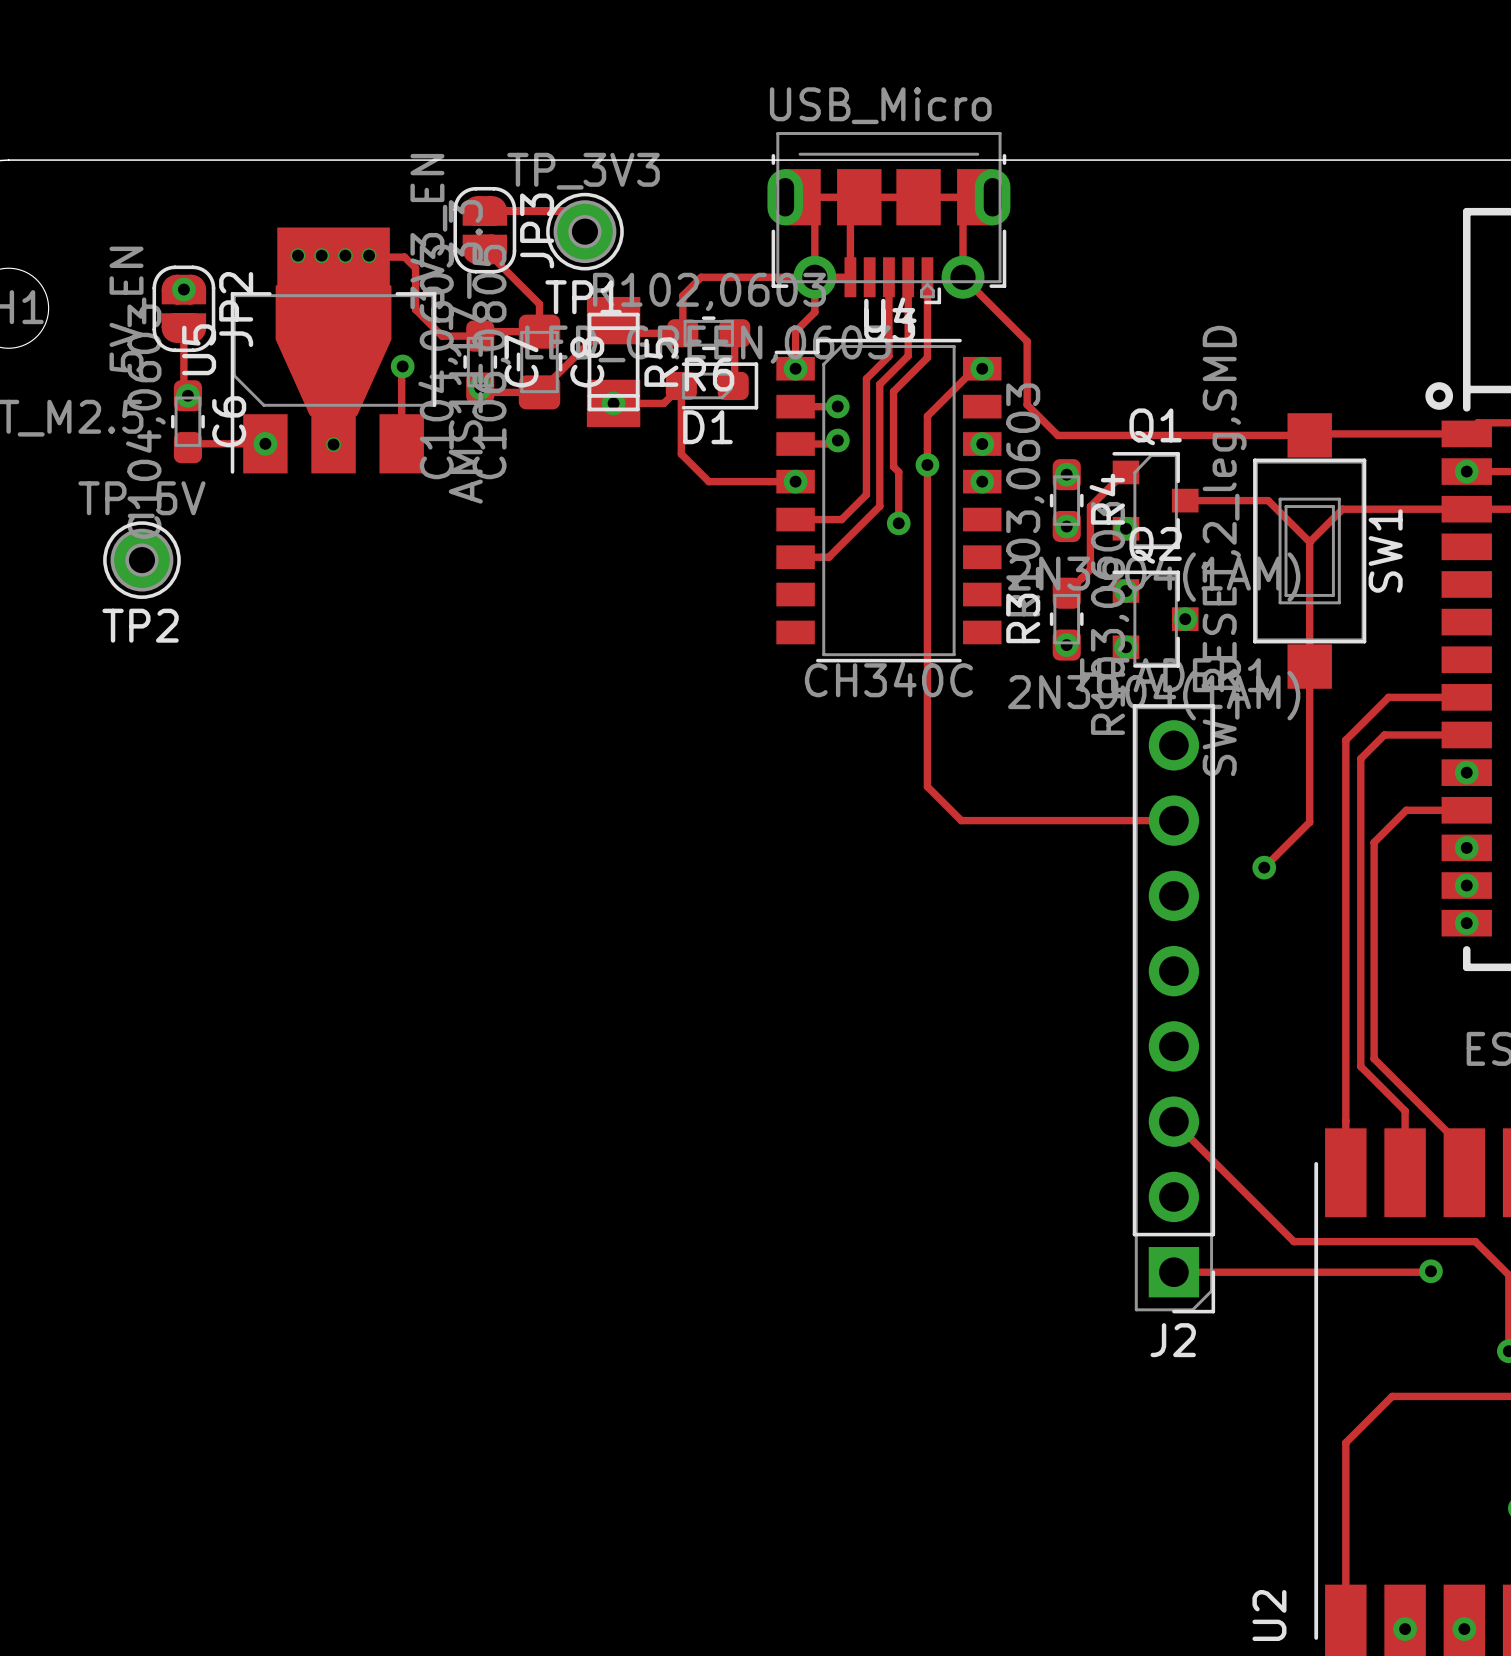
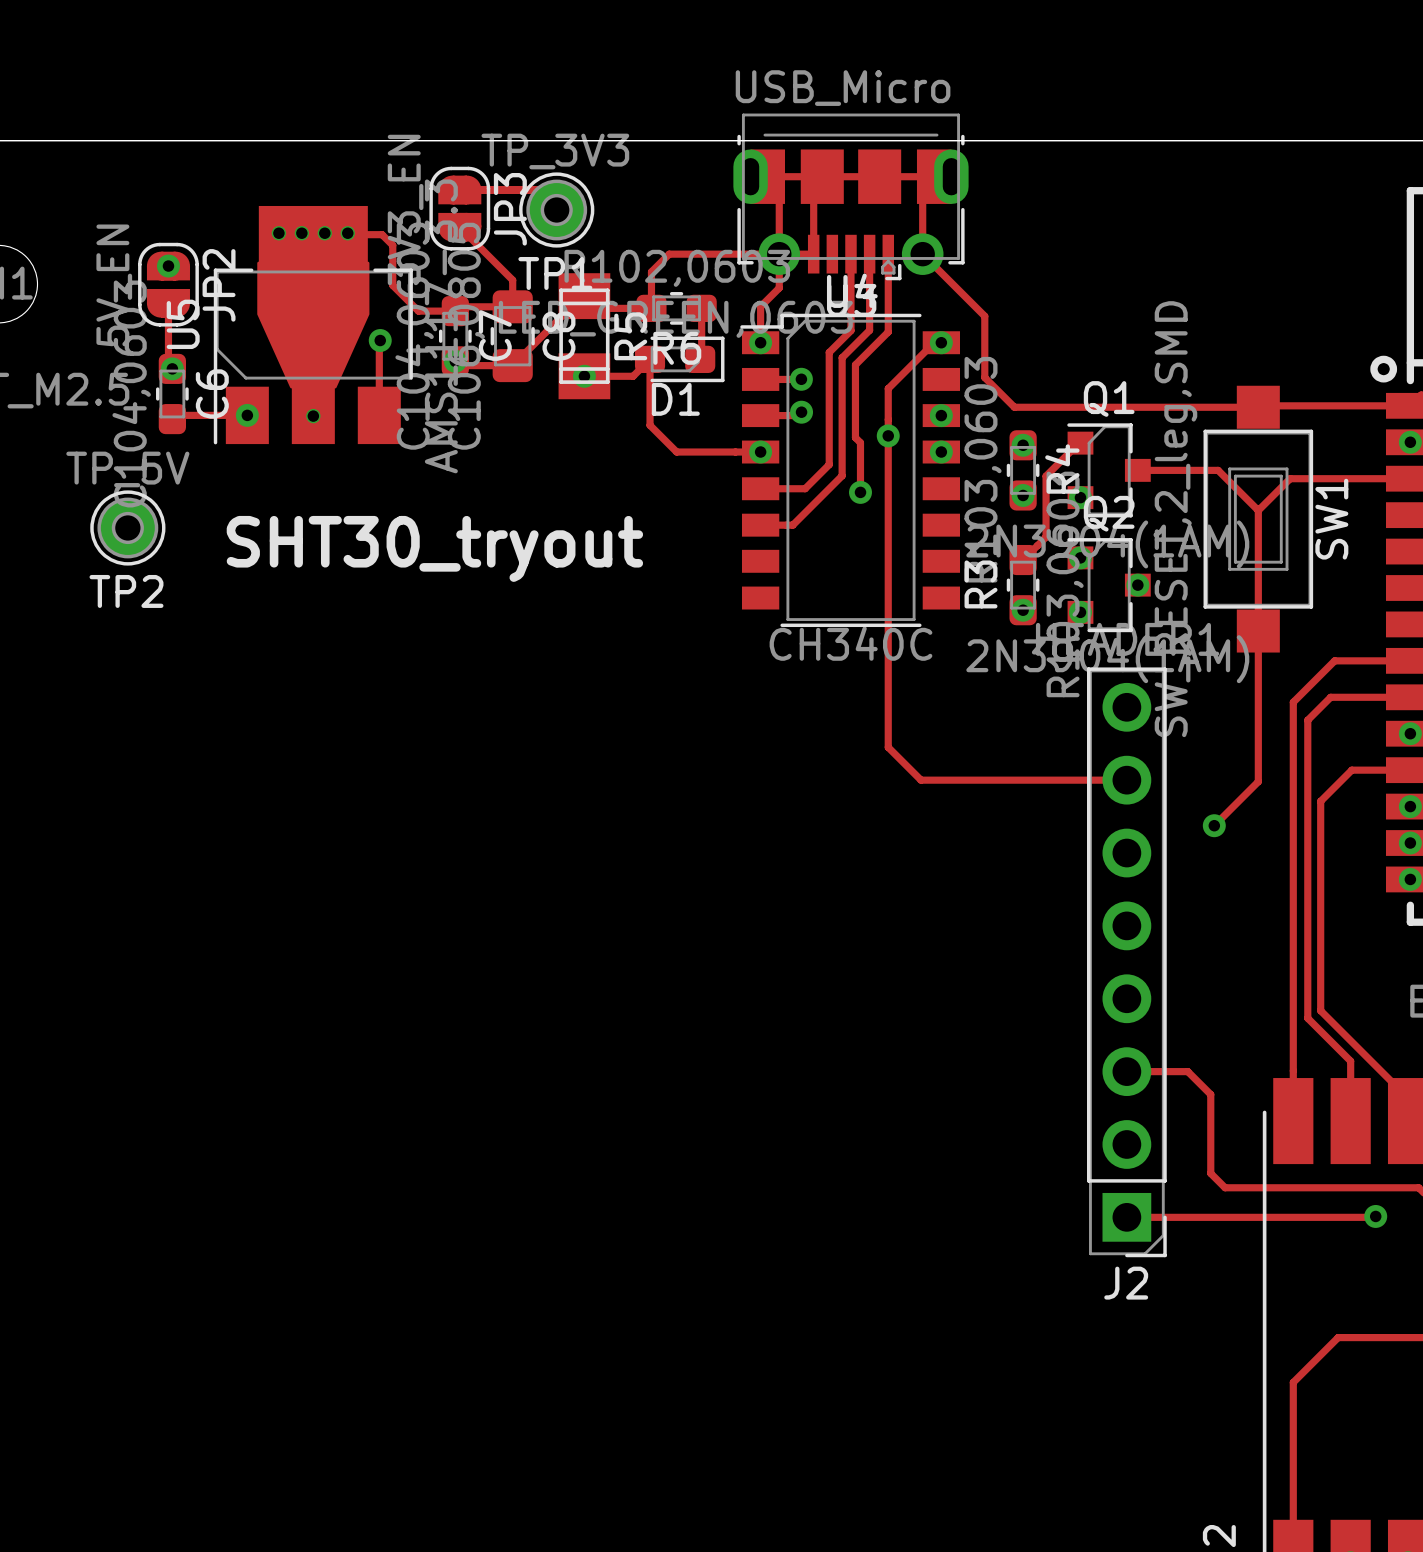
text: none -> SHT30_tryout (434, 548)
track: (1173, 1121) (1293, 1241) -> (1126, 1071) (1187, 1071) (1210, 1094) (1210, 1173) (1225, 1187) (1243, 1187)

